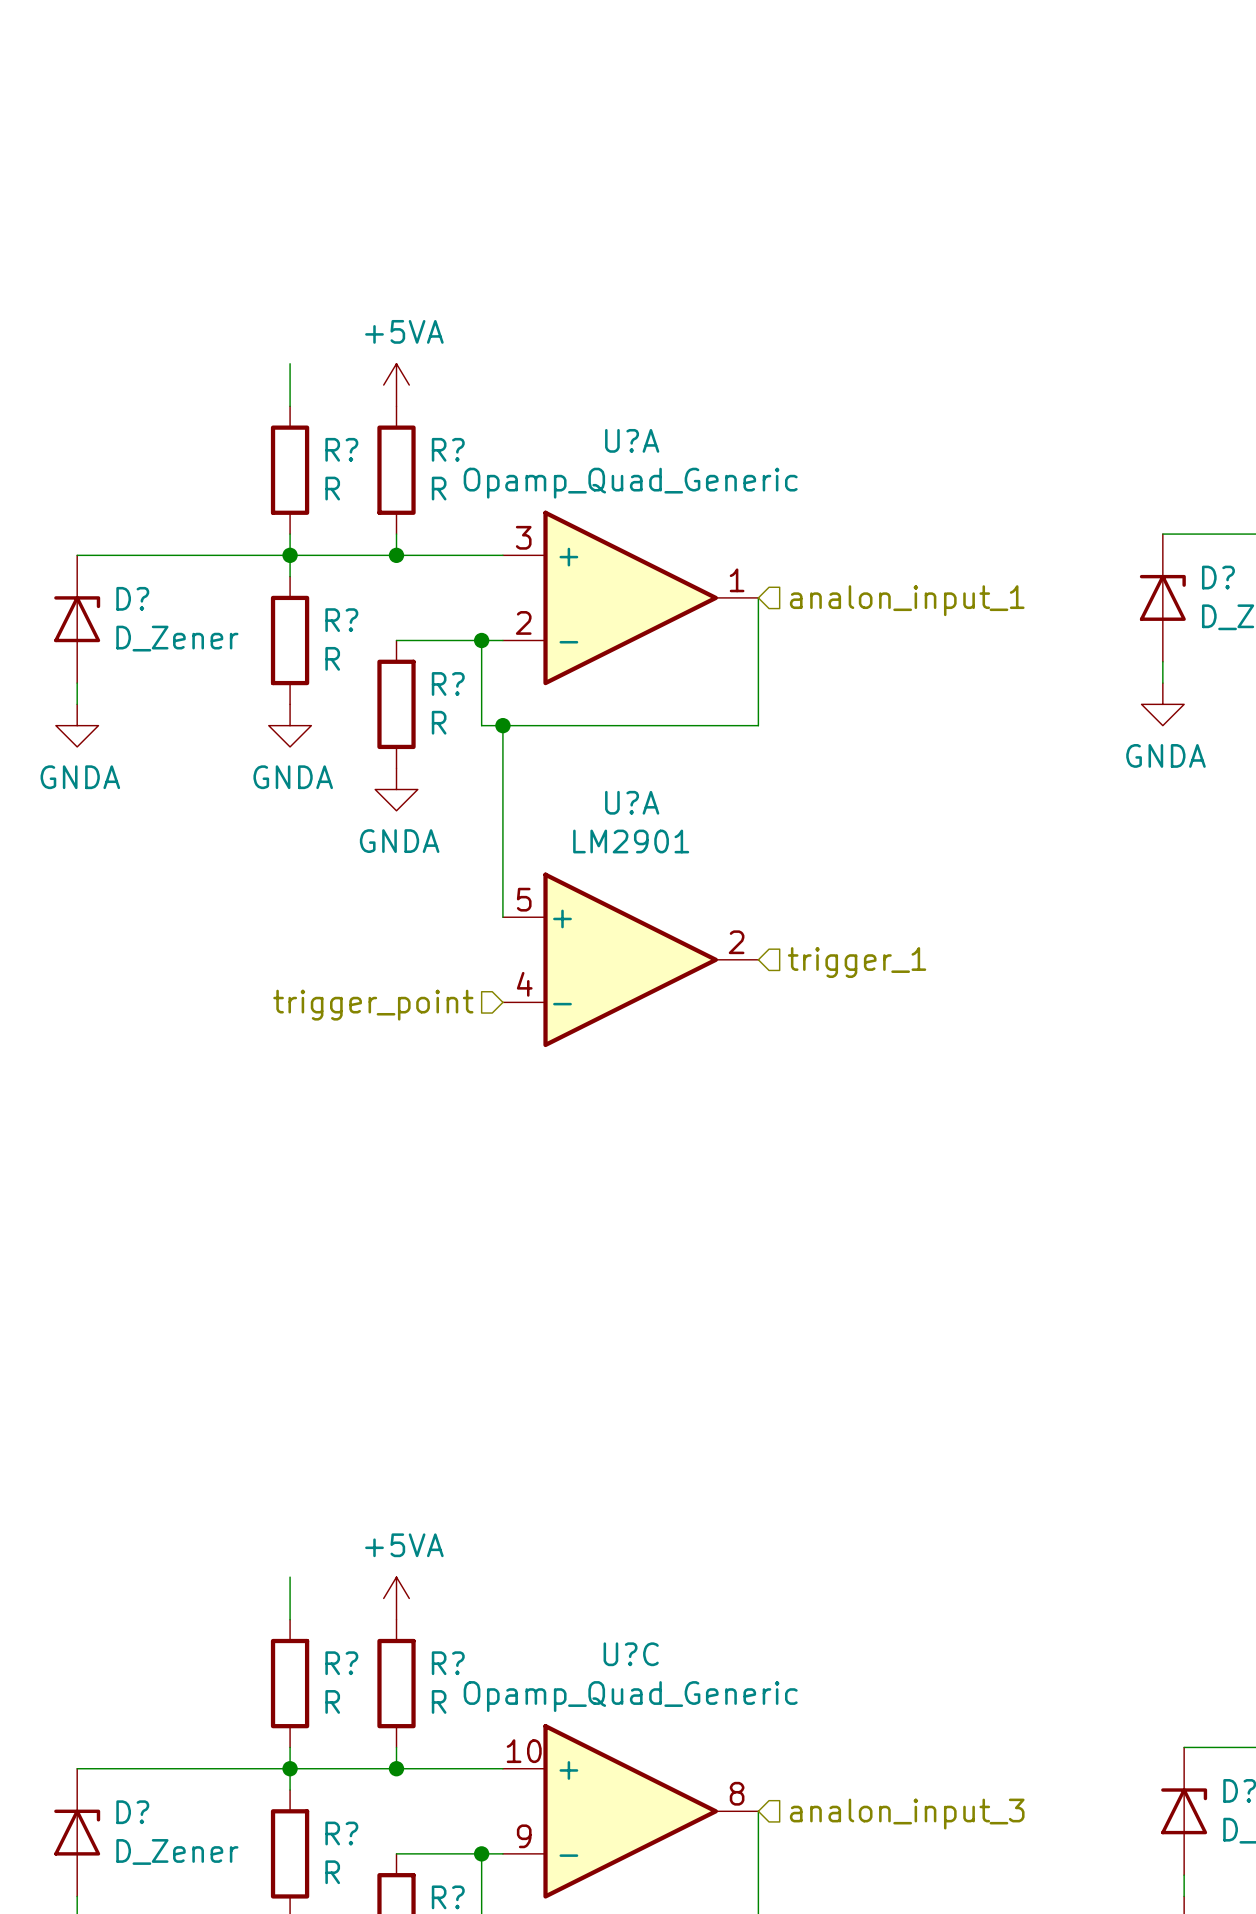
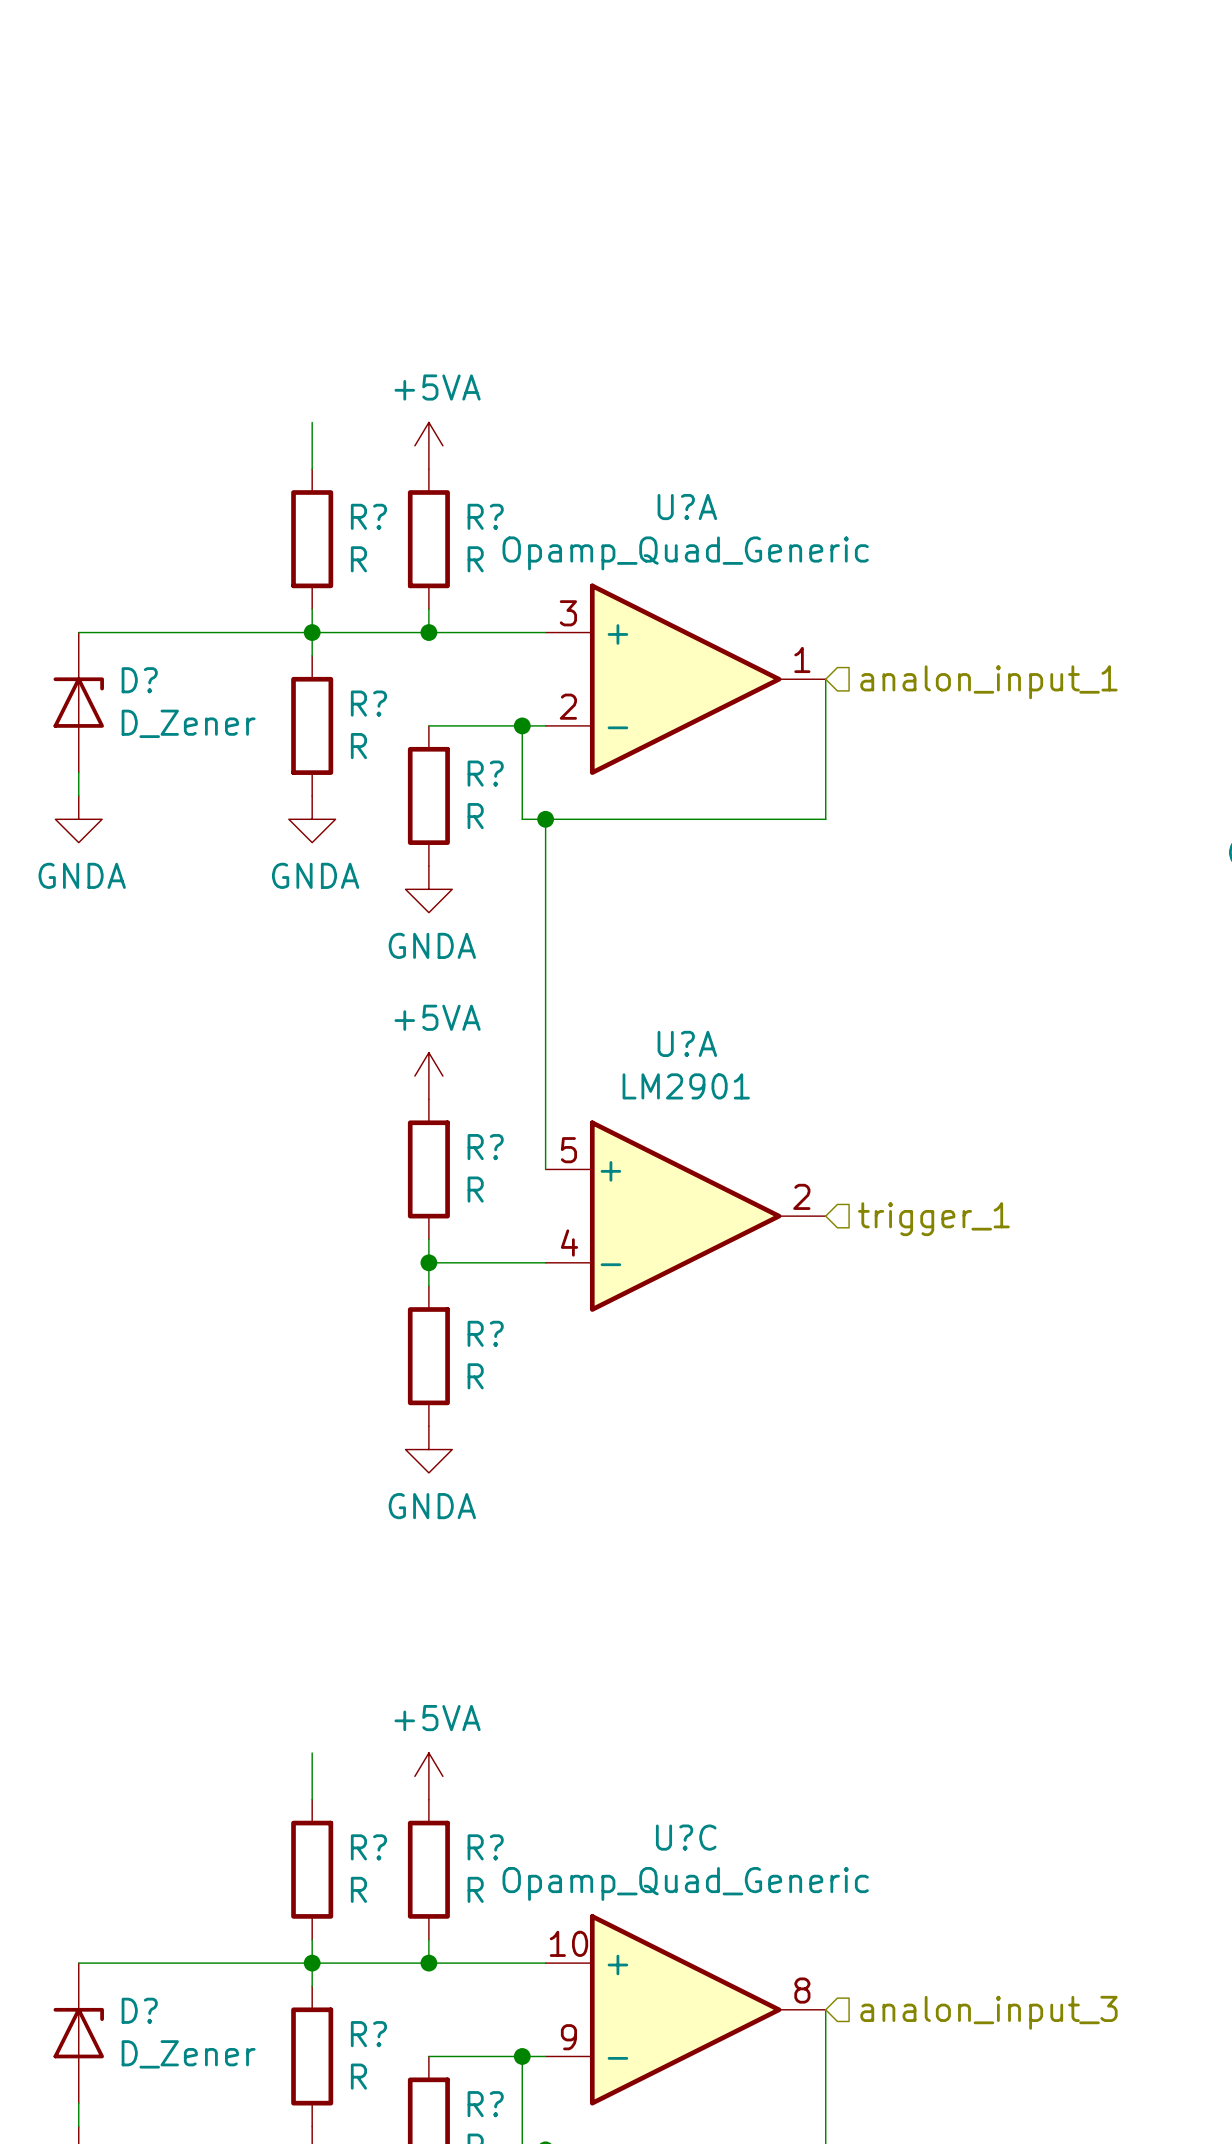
wire: none -> (545, 1029) (545, 1169)
power symbol: none -> +5VA (428, 1076)
U?A position: (630, 959) -> (685, 1216)
hierarchical label position: trigger_1 (857, 962) -> trigger_1 (933, 1219)
hierarchical label: trigger_point (373, 1005) -> none
R?: none -> R (428, 1169)
wire: none -> (428, 1239) (428, 1286)
wire: none -> (428, 1262) (545, 1262)
junction: none -> (428, 1262)
R?: none -> R (428, 1356)
power symbol: none -> GNDA (428, 1449)

